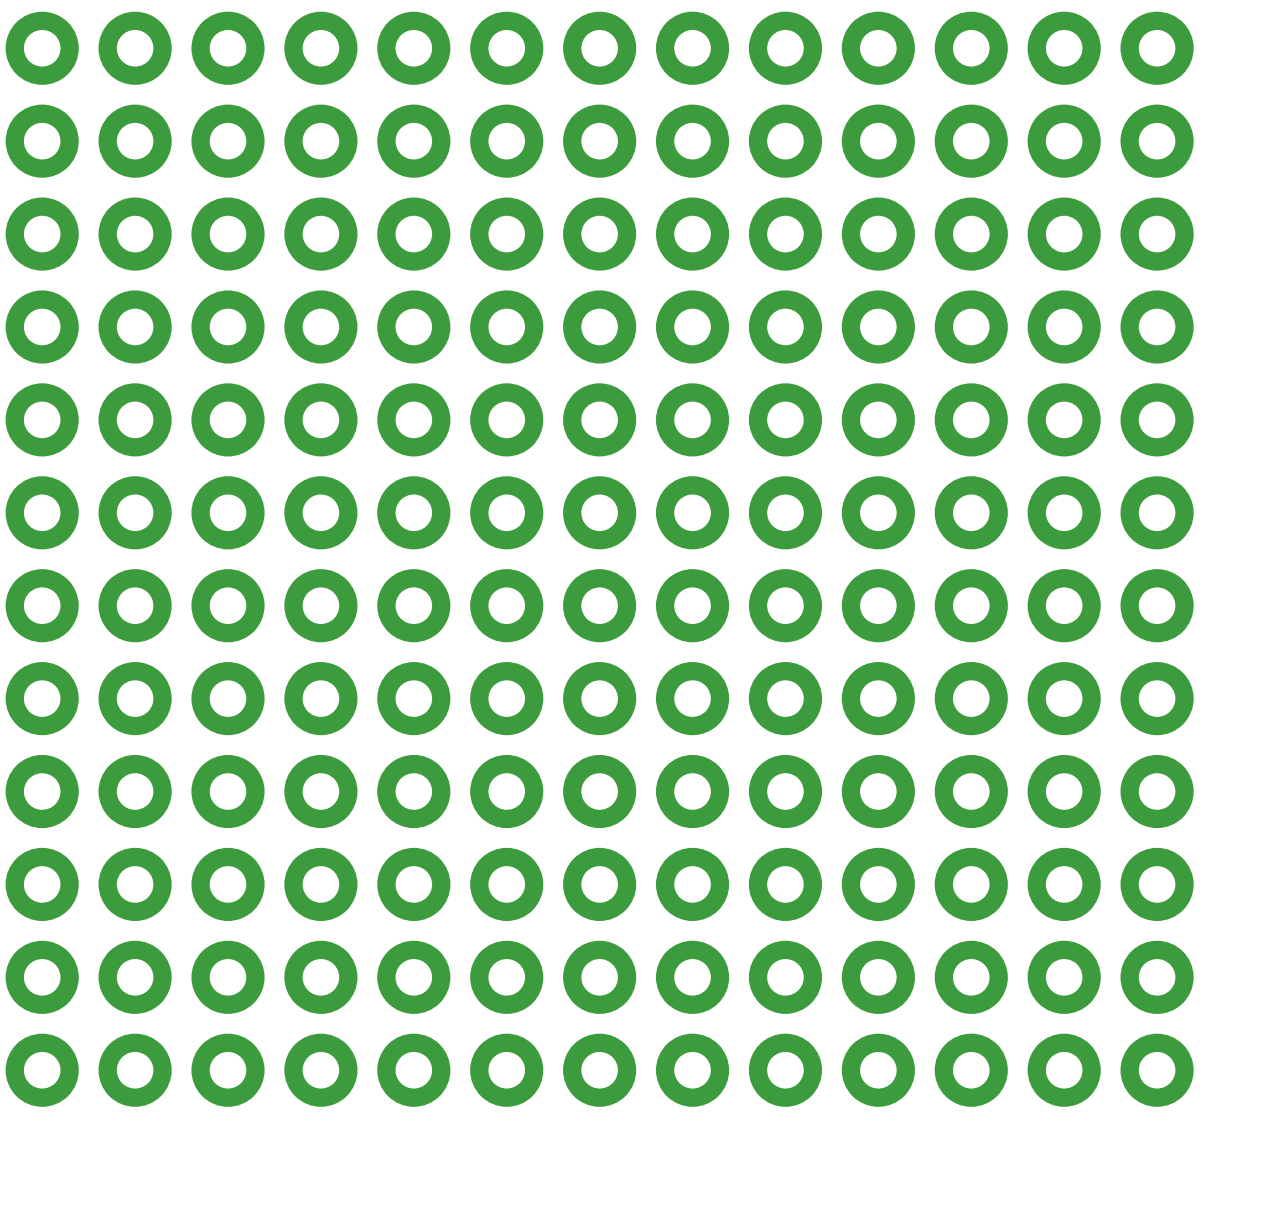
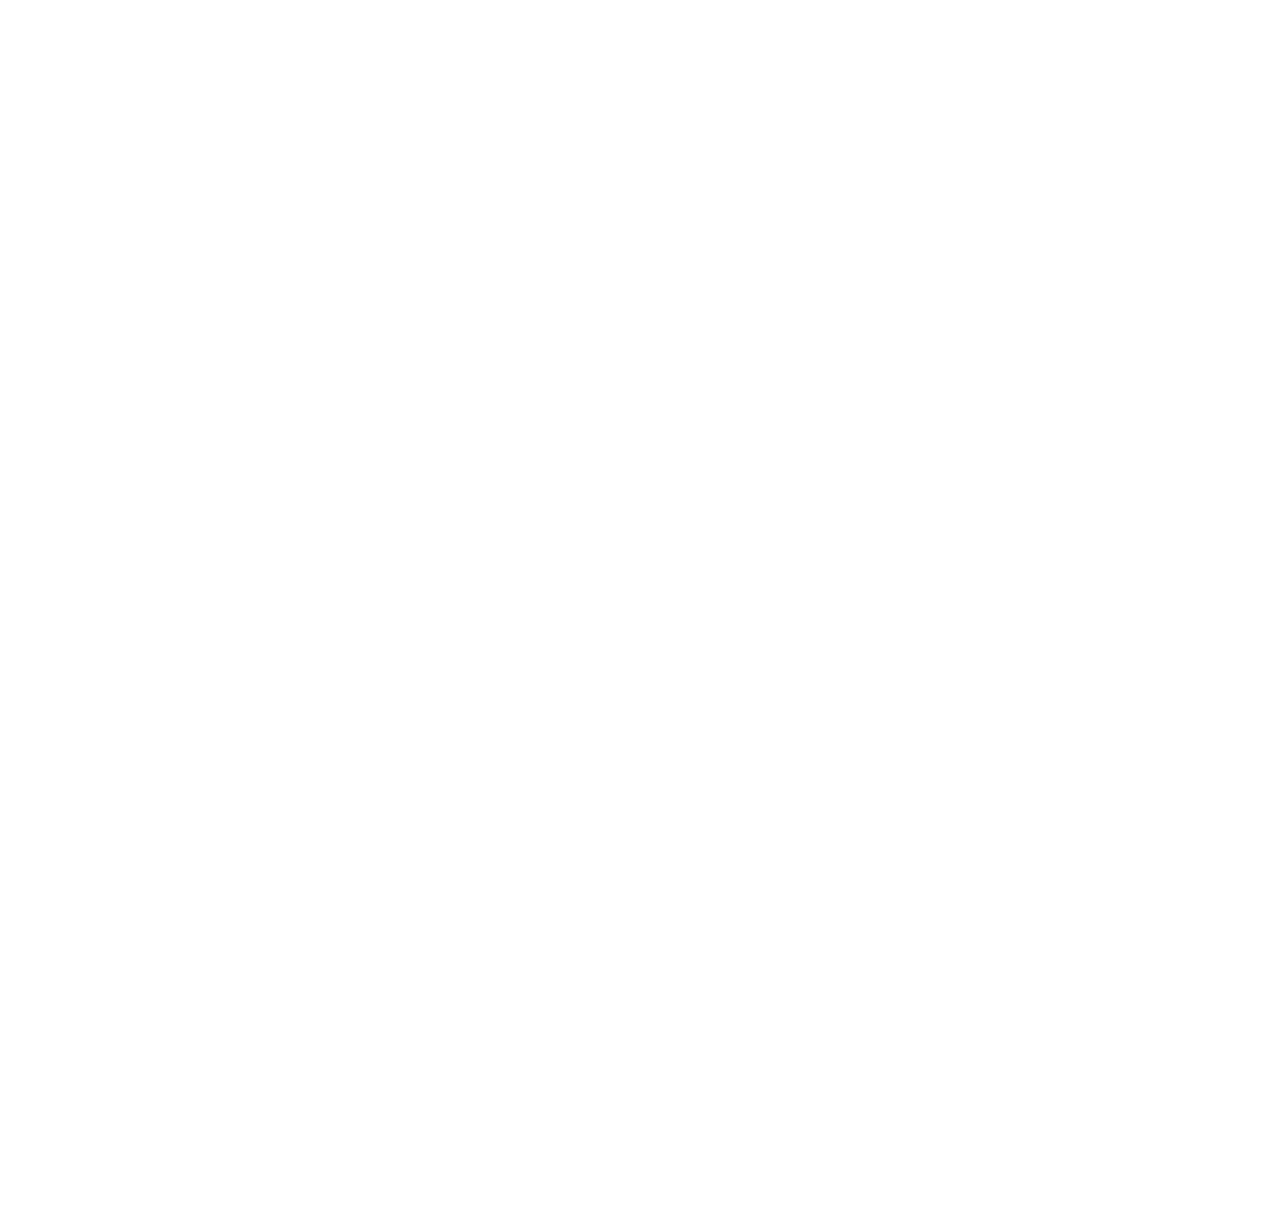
via: (42, 48) -> none
via: (135, 48) -> none
via: (228, 48) -> none
via: (320, 48) -> none
via: (413, 48) -> none
via: (506, 48) -> none
via: (599, 48) -> none
via: (692, 48) -> none
via: (785, 48) -> none
via: (878, 48) -> none
via: (971, 48) -> none
via: (1064, 48) -> none
via: (1157, 48) -> none
via: (42, 141) -> none
via: (135, 141) -> none
via: (228, 141) -> none
via: (320, 141) -> none
via: (413, 141) -> none
via: (506, 141) -> none
via: (599, 141) -> none
via: (692, 141) -> none
via: (785, 141) -> none
via: (878, 141) -> none
via: (971, 141) -> none
via: (1064, 141) -> none
via: (1157, 141) -> none
via: (42, 234) -> none
via: (135, 234) -> none
via: (228, 234) -> none
via: (320, 234) -> none
via: (413, 234) -> none
via: (506, 234) -> none
via: (599, 234) -> none
via: (692, 234) -> none
via: (785, 234) -> none
via: (878, 234) -> none
via: (971, 234) -> none
via: (1064, 234) -> none
via: (1157, 234) -> none
via: (42, 326) -> none
via: (135, 326) -> none
via: (228, 326) -> none
via: (320, 326) -> none
via: (413, 326) -> none
via: (506, 326) -> none
via: (599, 326) -> none
via: (692, 326) -> none
via: (785, 326) -> none
via: (878, 326) -> none
via: (971, 326) -> none
via: (1064, 326) -> none
via: (1157, 326) -> none
via: (42, 419) -> none
via: (135, 419) -> none
via: (228, 419) -> none
via: (320, 419) -> none
via: (413, 419) -> none
via: (506, 419) -> none
via: (599, 419) -> none
via: (692, 419) -> none
via: (785, 419) -> none
via: (878, 419) -> none
via: (971, 419) -> none
via: (1064, 419) -> none
via: (1157, 419) -> none
via: (42, 512) -> none
via: (135, 512) -> none
via: (228, 512) -> none
via: (320, 512) -> none
via: (413, 512) -> none
via: (506, 512) -> none
via: (599, 512) -> none
via: (692, 512) -> none
via: (785, 512) -> none
via: (878, 512) -> none
via: (971, 512) -> none
via: (1064, 512) -> none
via: (1157, 512) -> none
via: (42, 605) -> none
via: (135, 605) -> none
via: (228, 605) -> none
via: (320, 605) -> none
via: (413, 605) -> none
via: (506, 605) -> none
via: (599, 605) -> none
via: (692, 605) -> none
via: (785, 605) -> none
via: (878, 605) -> none
via: (971, 605) -> none
via: (1064, 605) -> none
via: (1157, 605) -> none
via: (42, 698) -> none
via: (135, 698) -> none
via: (228, 698) -> none
via: (320, 698) -> none
via: (413, 698) -> none
via: (506, 698) -> none
via: (599, 698) -> none
via: (692, 698) -> none
via: (785, 698) -> none
via: (878, 698) -> none
via: (971, 698) -> none
via: (1064, 698) -> none
via: (1157, 698) -> none
via: (42, 791) -> none
via: (135, 791) -> none
via: (228, 791) -> none
via: (320, 791) -> none
via: (413, 791) -> none
via: (506, 791) -> none
via: (599, 791) -> none
via: (692, 791) -> none
via: (785, 791) -> none
via: (878, 791) -> none
via: (971, 791) -> none
via: (1064, 791) -> none
via: (1157, 791) -> none
via: (42, 884) -> none
via: (135, 884) -> none
via: (228, 884) -> none
via: (320, 884) -> none
via: (413, 884) -> none
via: (506, 884) -> none
via: (599, 884) -> none
via: (692, 884) -> none
via: (785, 884) -> none
via: (878, 884) -> none
via: (971, 884) -> none
via: (1064, 884) -> none
via: (1157, 884) -> none
via: (42, 977) -> none
via: (135, 977) -> none
via: (228, 977) -> none
via: (320, 977) -> none
via: (413, 977) -> none
via: (506, 977) -> none
via: (599, 977) -> none
via: (692, 977) -> none
via: (785, 977) -> none
via: (878, 977) -> none
via: (971, 977) -> none
via: (1064, 977) -> none
via: (1157, 977) -> none
via: (42, 1070) -> none
via: (135, 1070) -> none
via: (228, 1070) -> none
via: (320, 1070) -> none
via: (413, 1070) -> none
via: (506, 1070) -> none
via: (599, 1070) -> none
via: (692, 1070) -> none
via: (785, 1070) -> none
via: (878, 1070) -> none
via: (971, 1070) -> none
via: (1064, 1070) -> none
via: (1157, 1070) -> none

